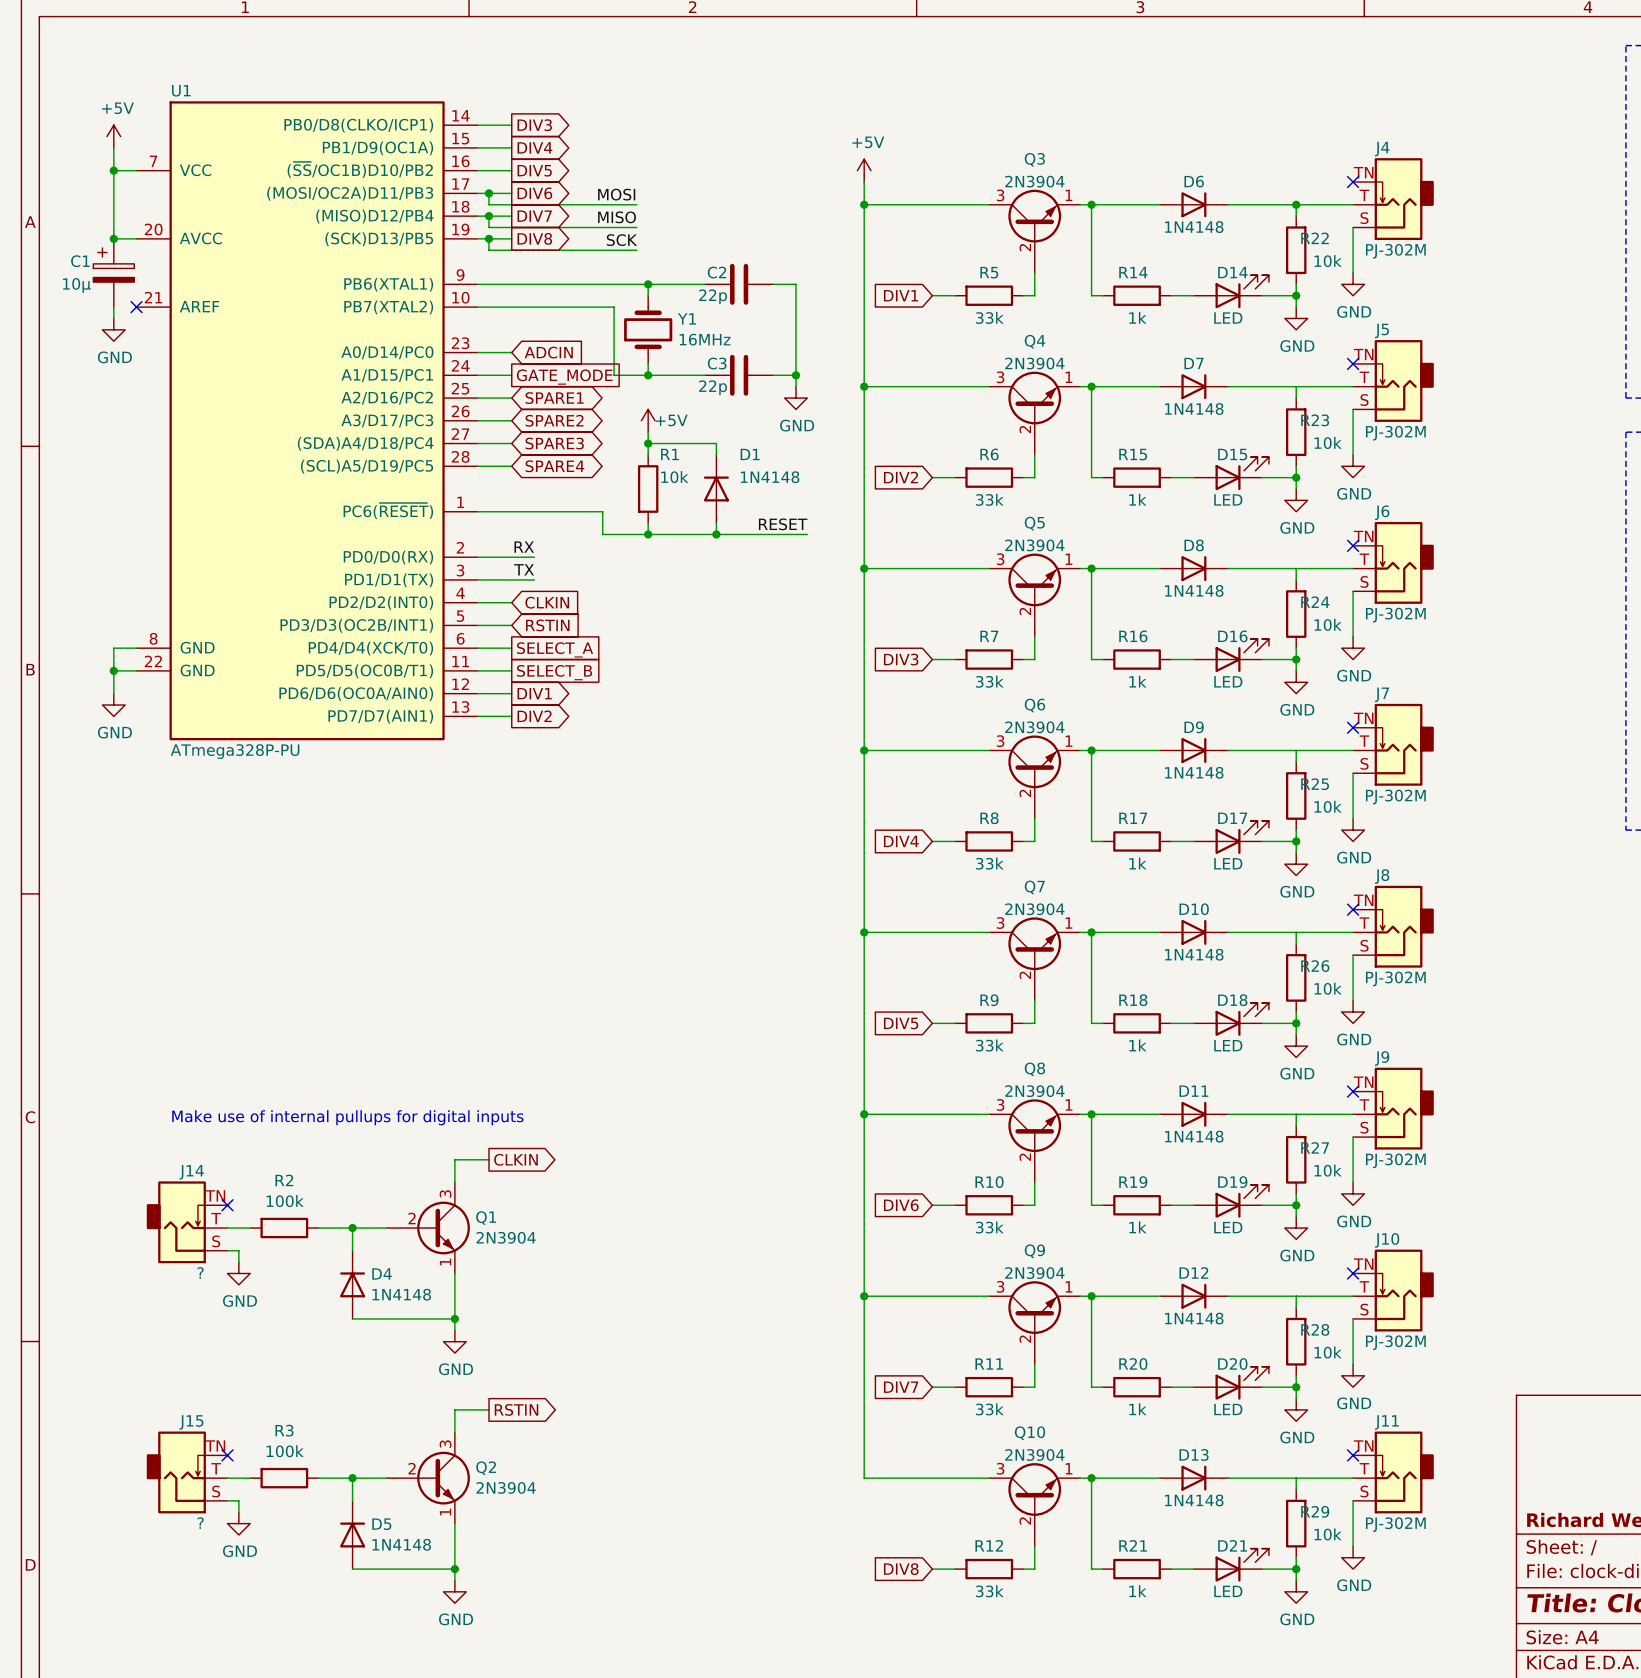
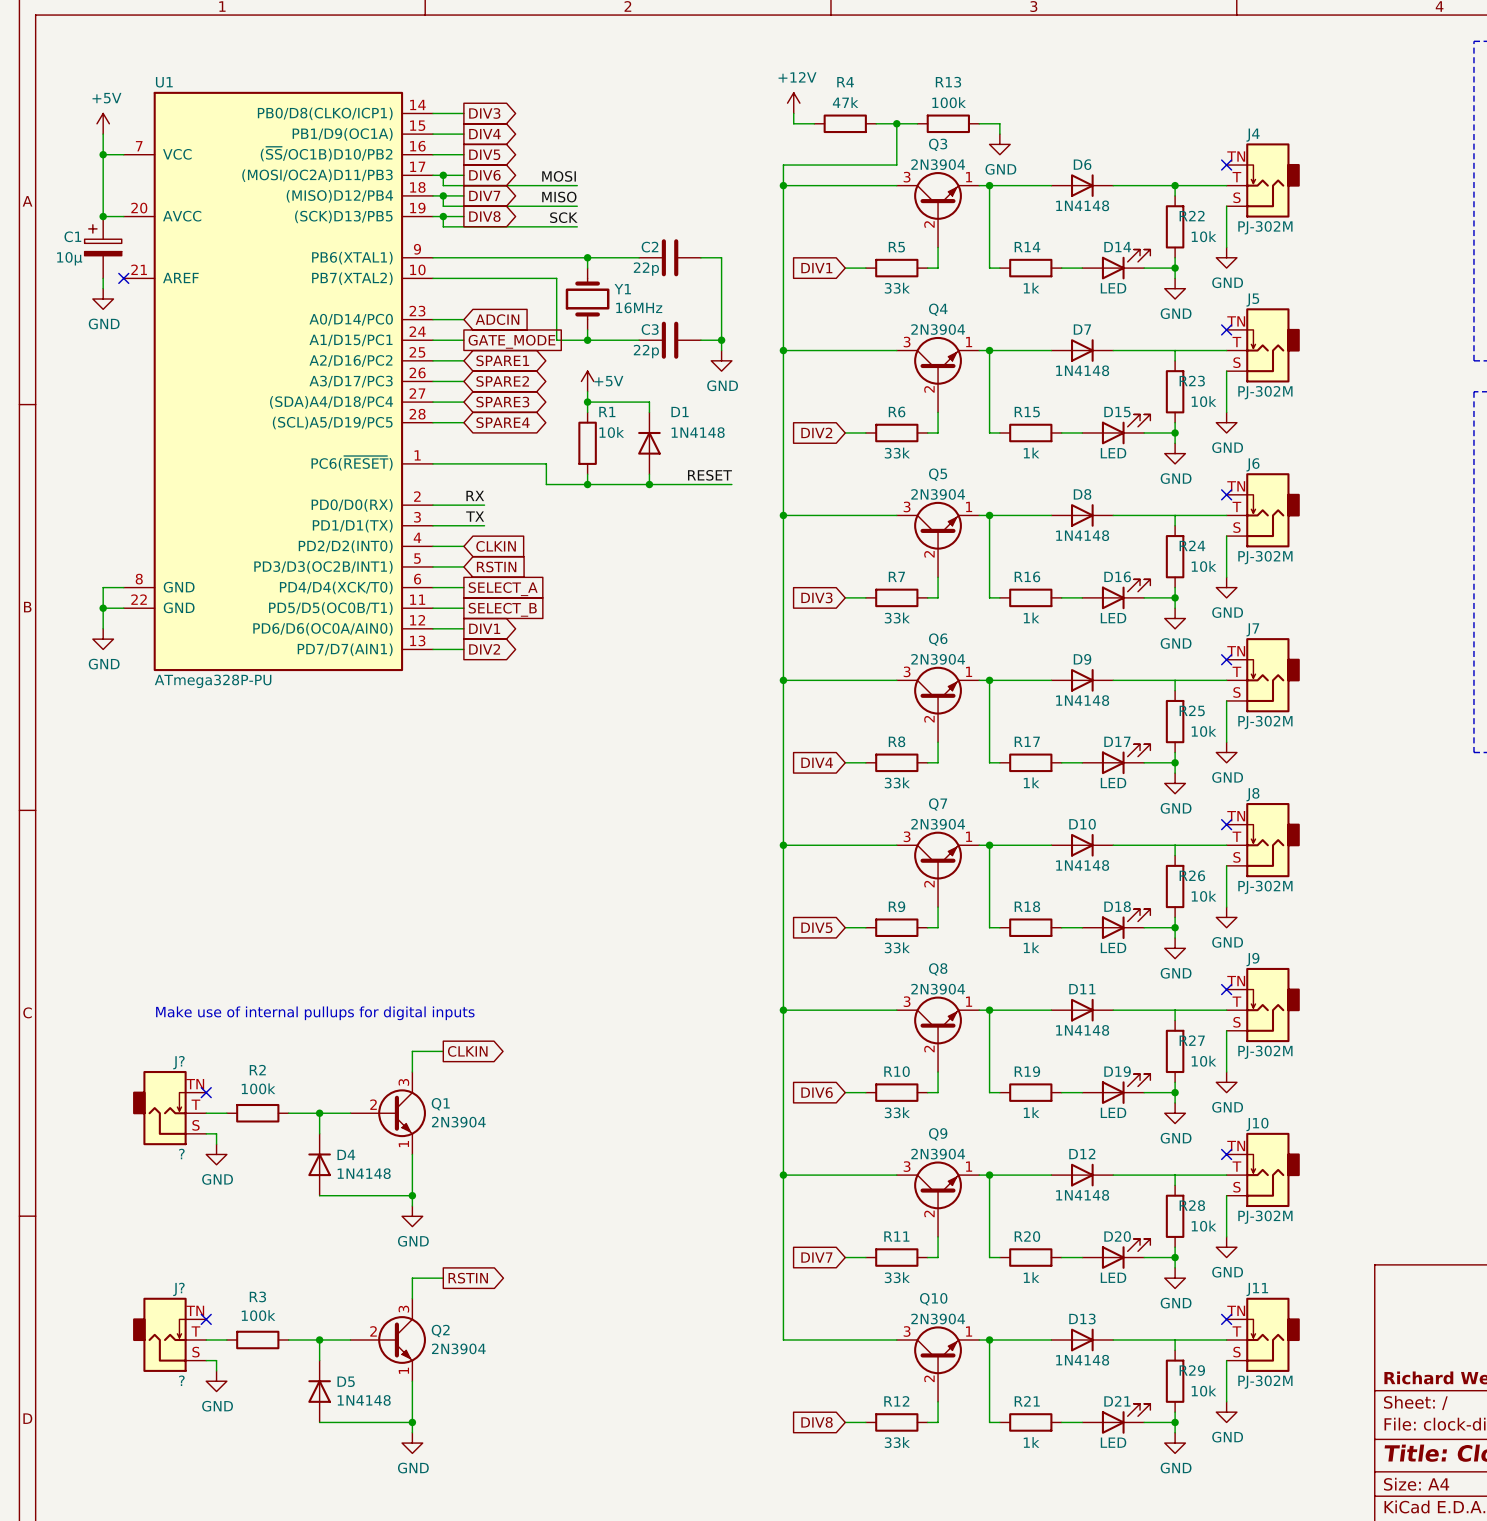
power symbol: none -> +12V (793, 103)
wire: none -> (793, 113) (793, 123) (814, 123)
R4: none -> 47k (845, 123)
wire: none -> (876, 123) (917, 123)
wire: none -> (896, 123) (896, 165) (783, 165)
junction: none -> (896, 123)
R13: none -> 100k (948, 123)
wire: none -> (979, 123) (999, 123) (999, 134)
power symbol: none -> GND (999, 144)
power symbol: +5V (864, 170) -> none
J14 name: J14 (191, 1172) -> J? (178, 1062)
J15 name: J15 (191, 1422) -> J? (178, 1289)

